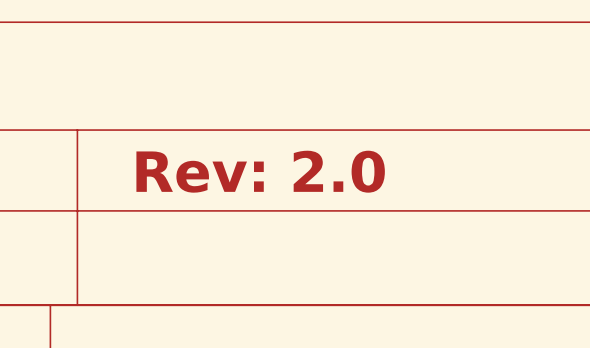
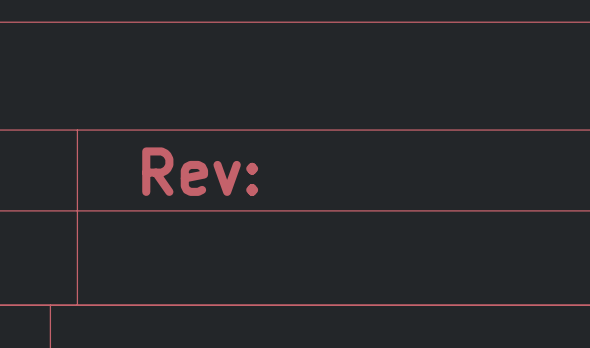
title block: Rev: 2.0 (260, 171) -> Rev: (200, 171)

